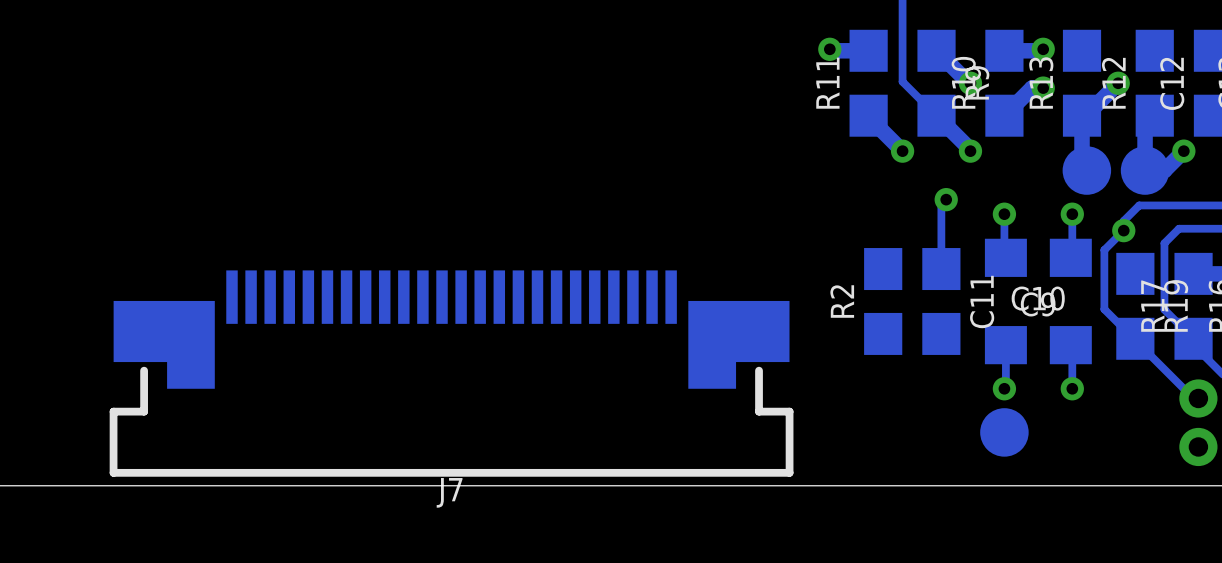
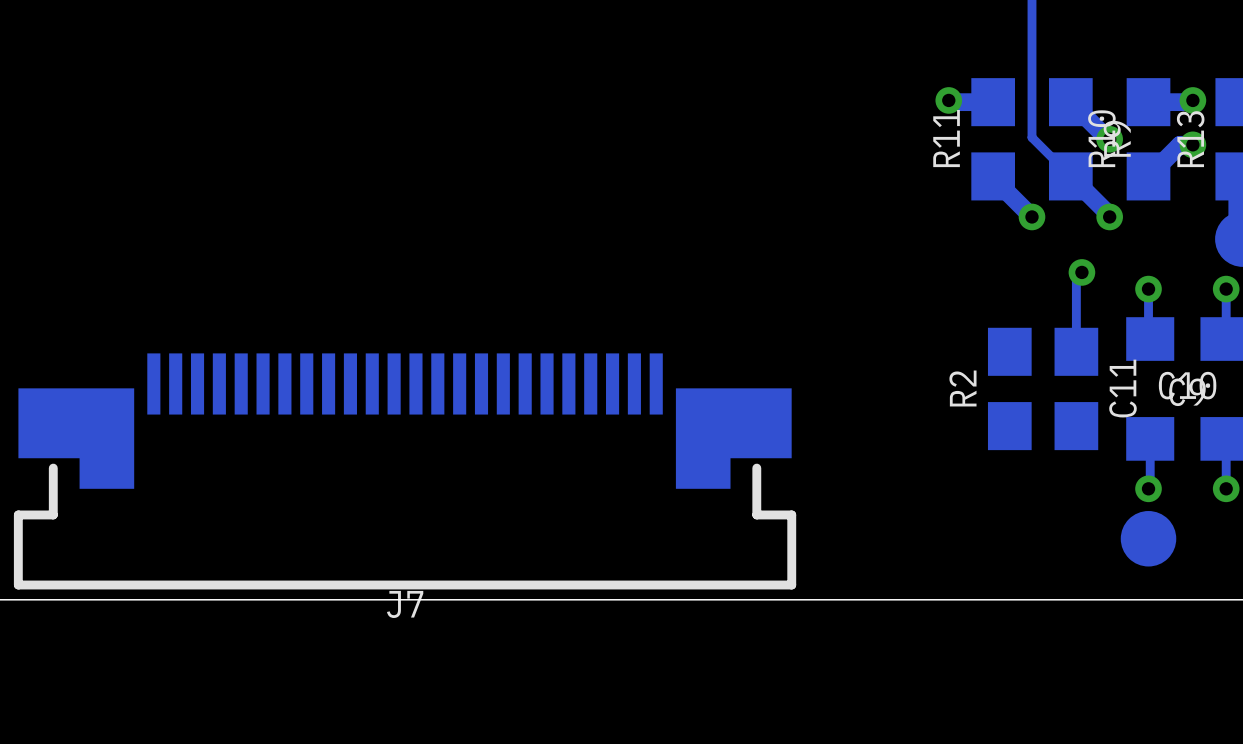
J7 position: (451, 373) -> (405, 471)

